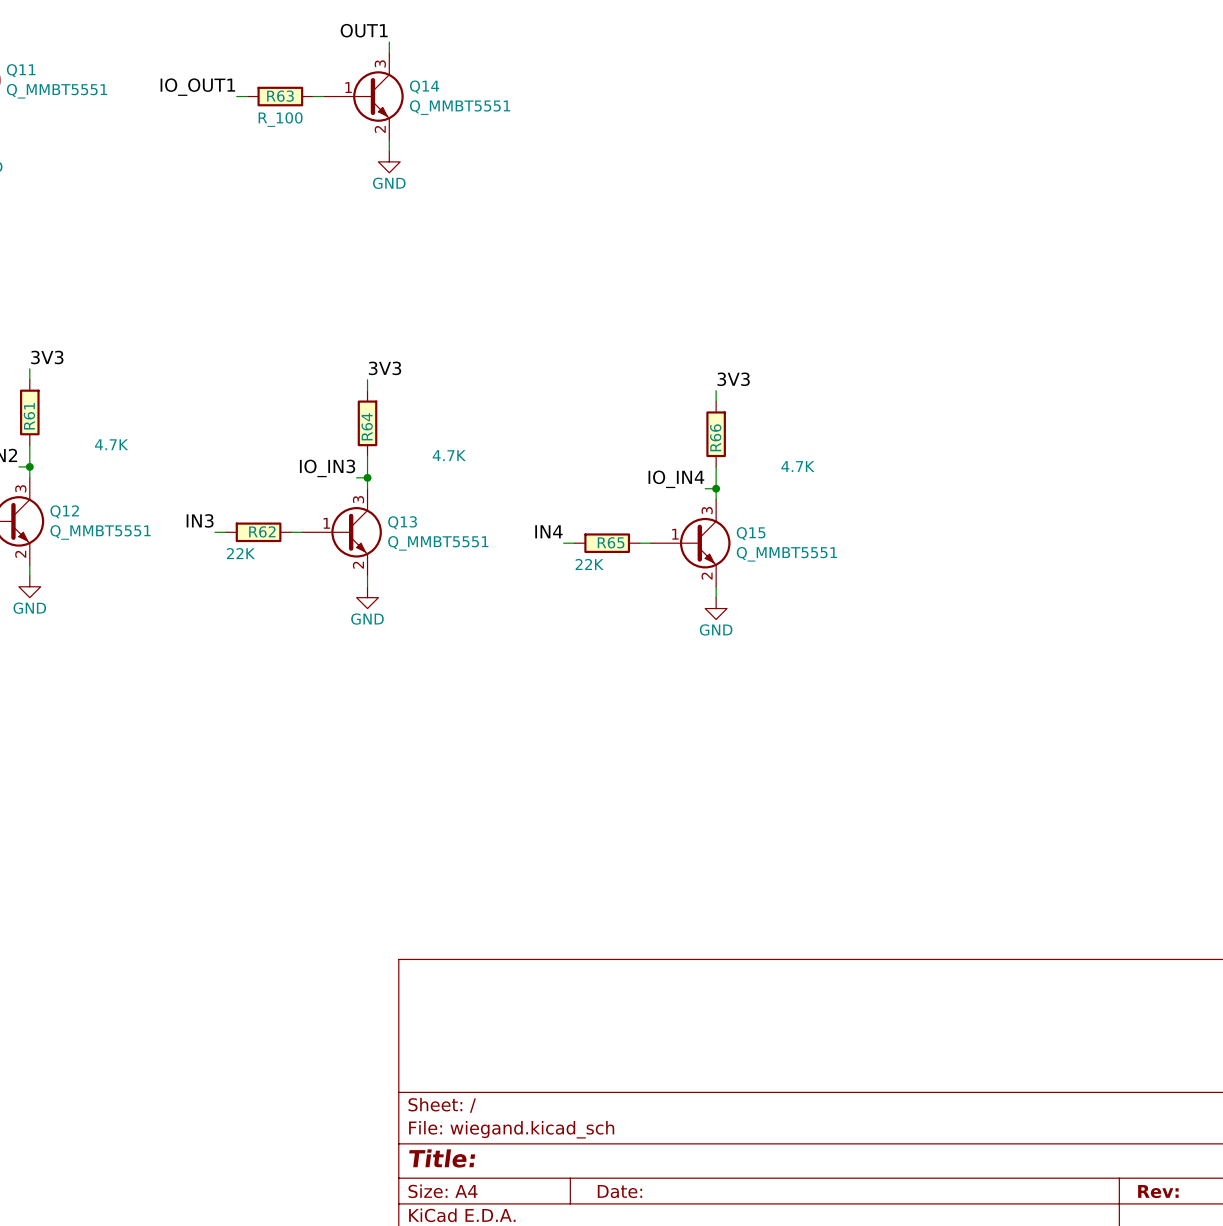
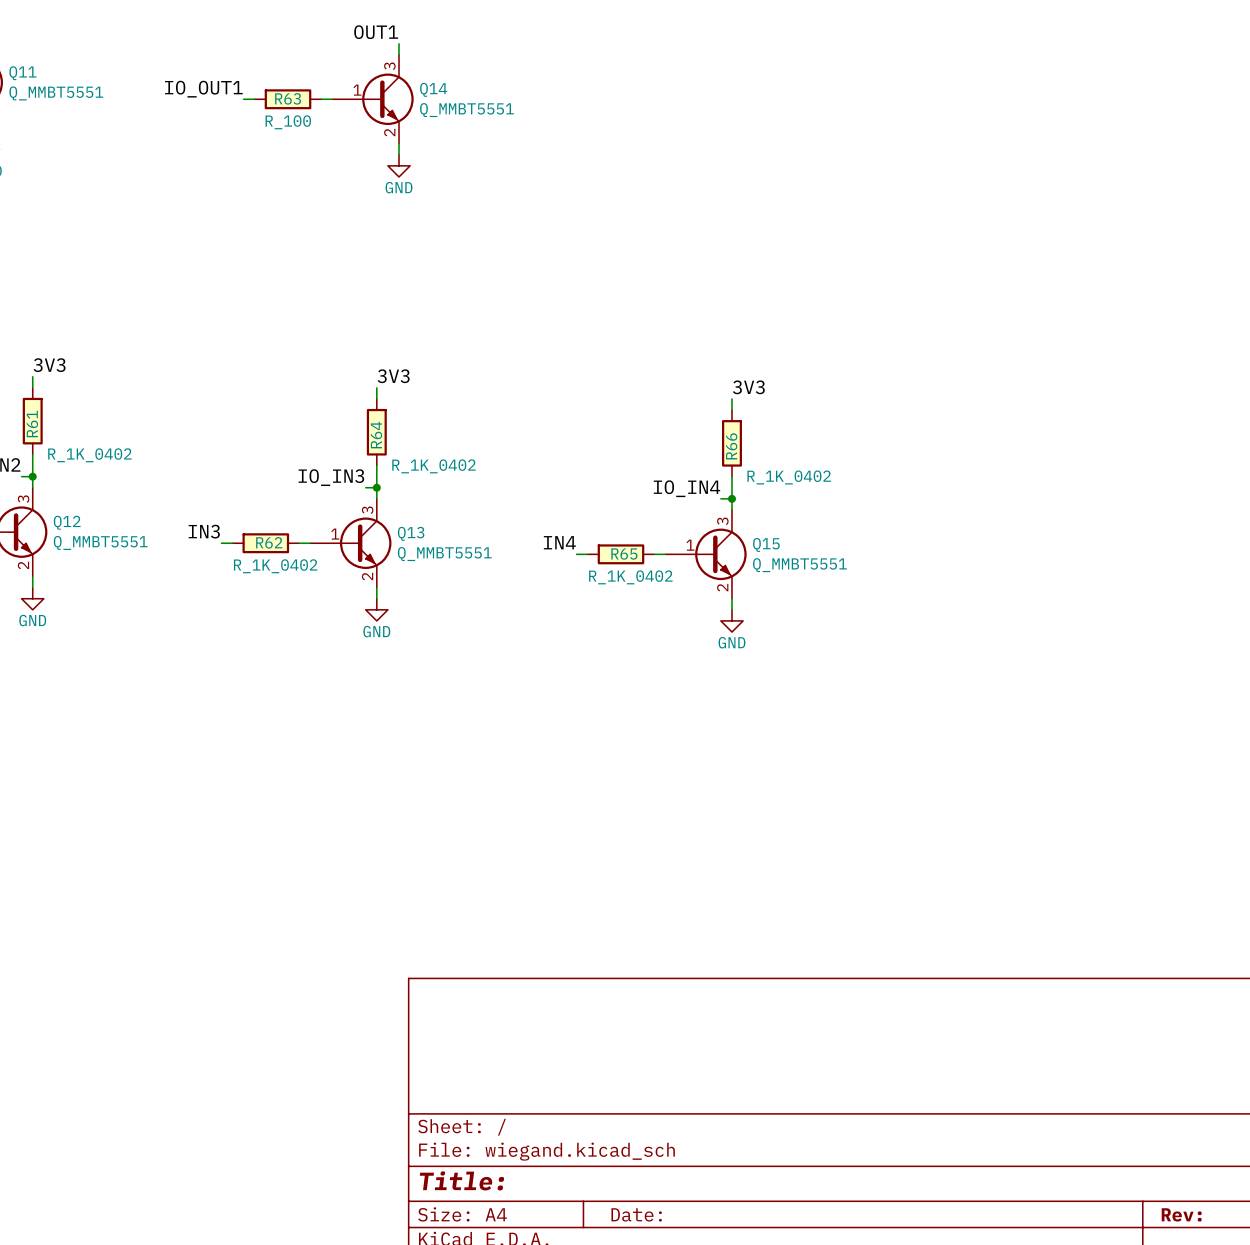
R61 value: 4.7K (111, 444) -> R_1K_0402 (89, 455)
R64 value: 4.7K (449, 455) -> R_1K_0402 (433, 466)
R66 value: 4.7K (797, 466) -> R_1K_0402 (789, 477)
R62 value: 22K (241, 553) -> R_1K_0402 (275, 566)
R65 value: 22K (589, 564) -> R_1K_0402 (630, 577)

